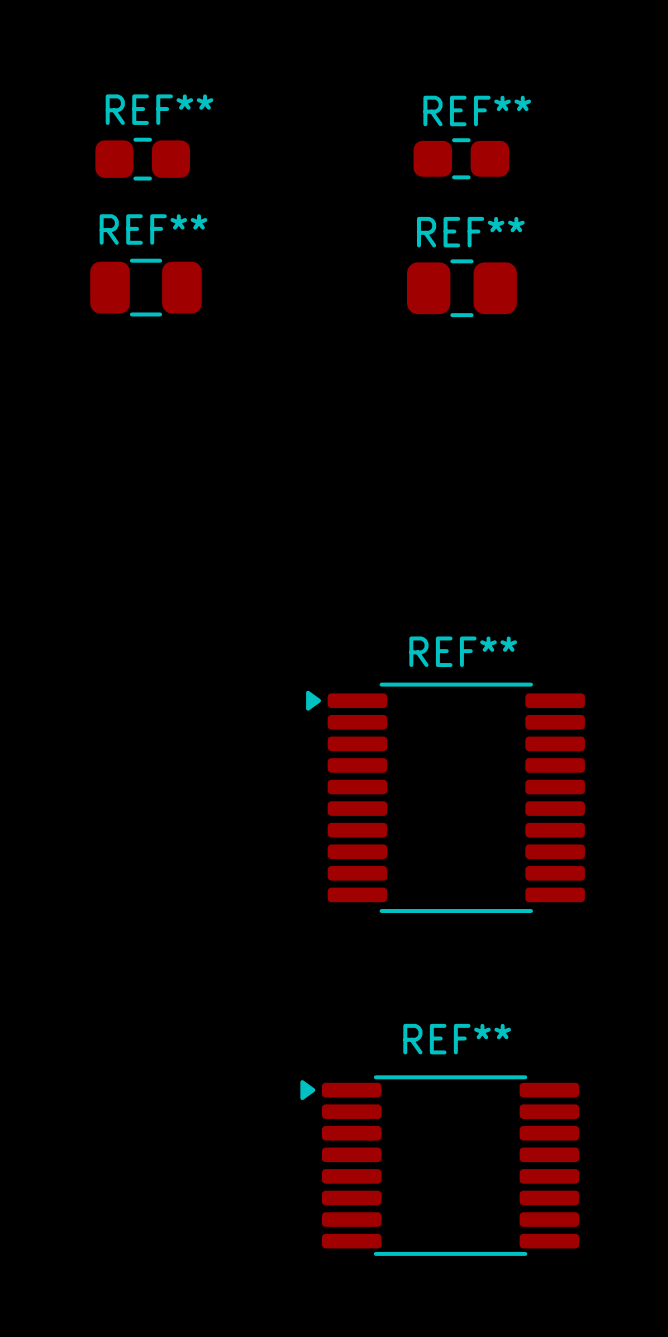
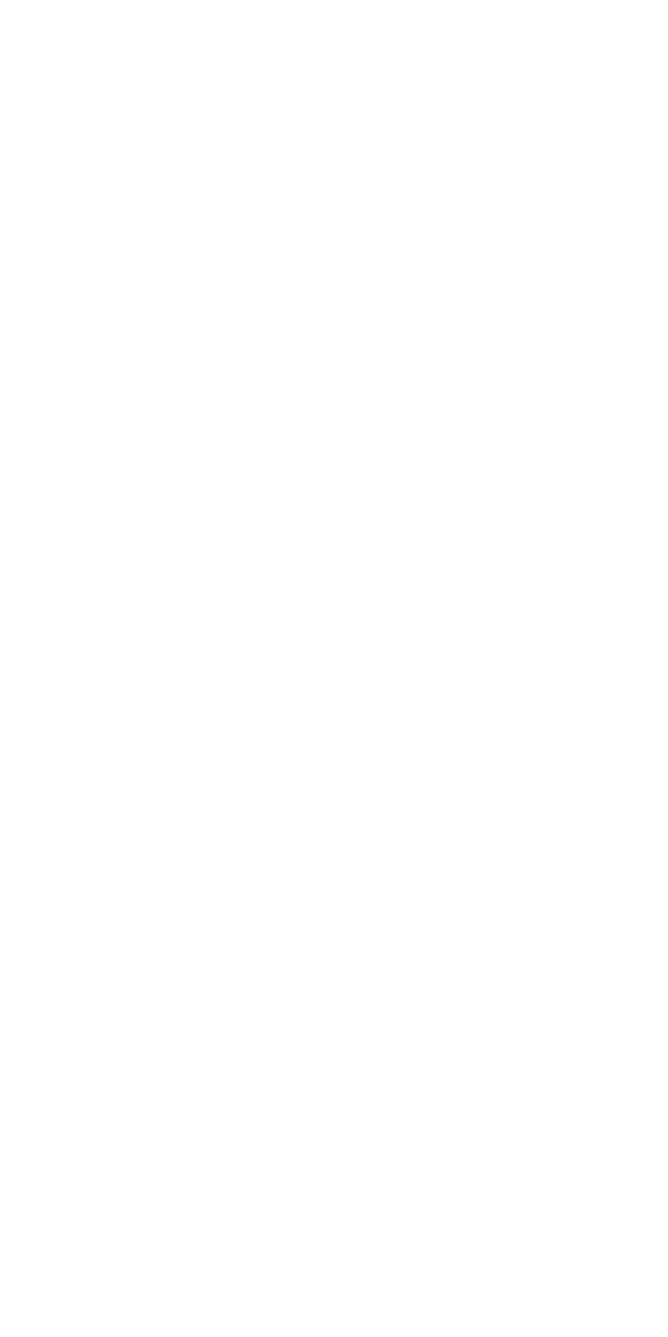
REF**: (461, 158) -> none
REF**: (142, 159) -> none
REF**: (145, 287) -> none
REF**: (461, 288) -> none
REF**: (445, 797) -> none
REF**: (439, 1165) -> none

